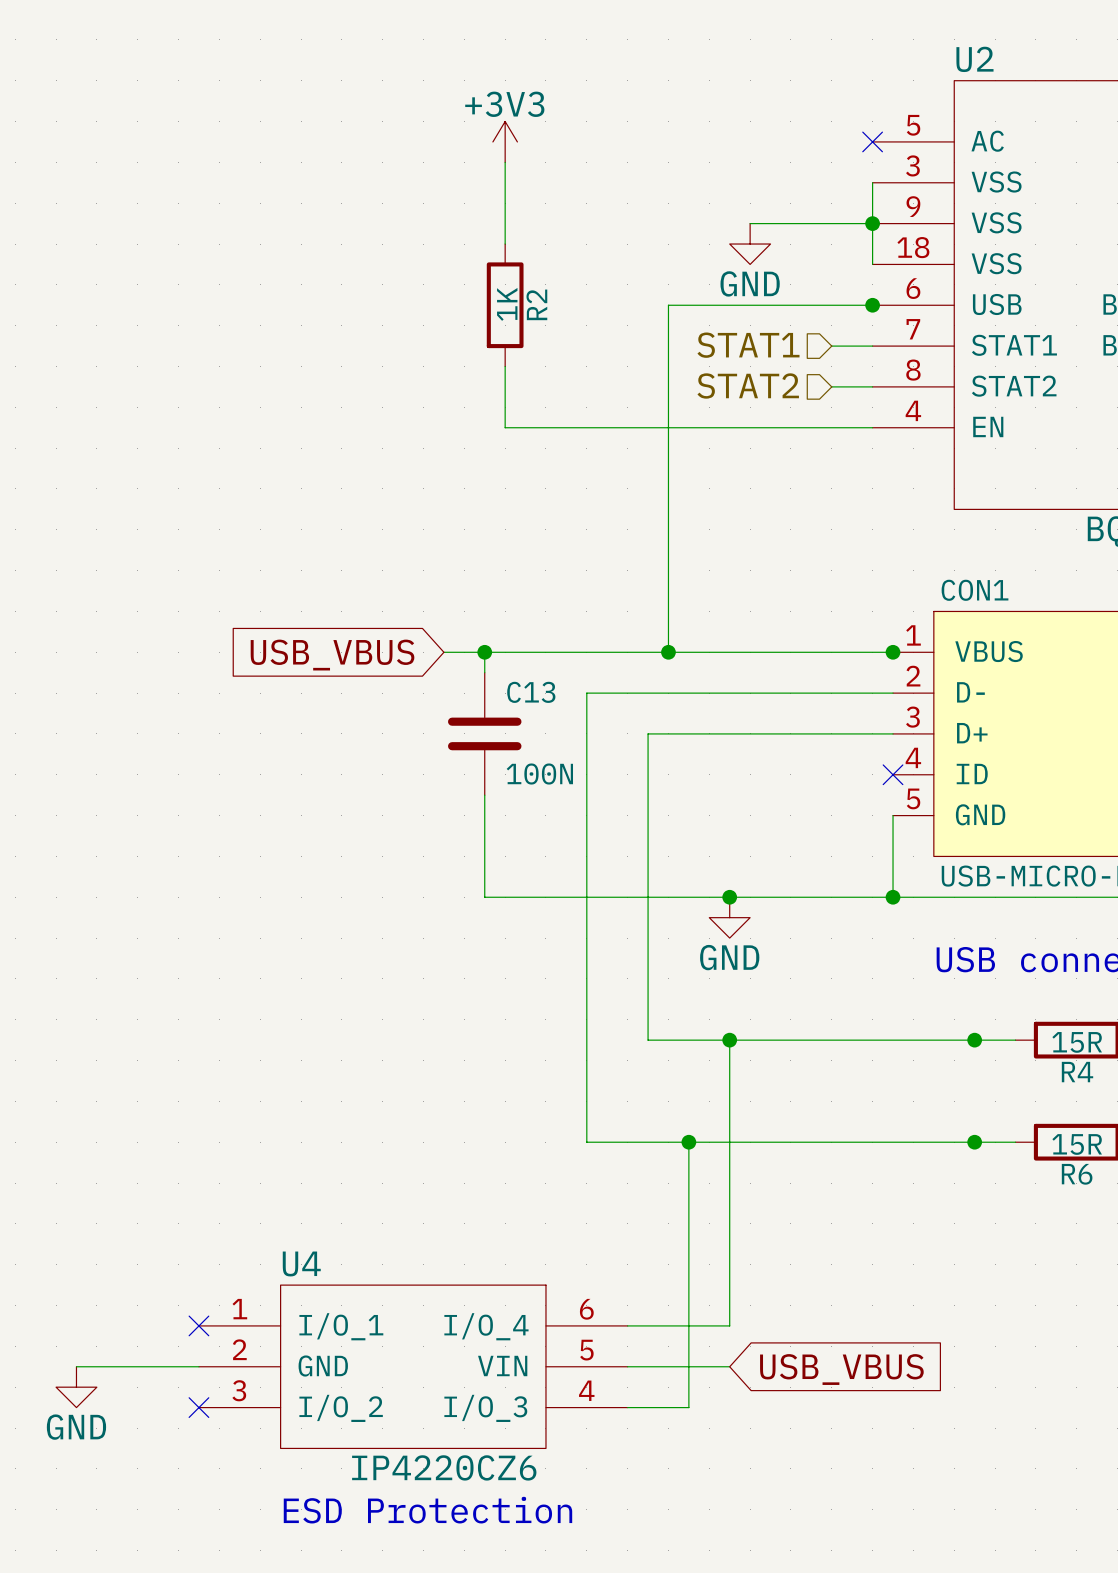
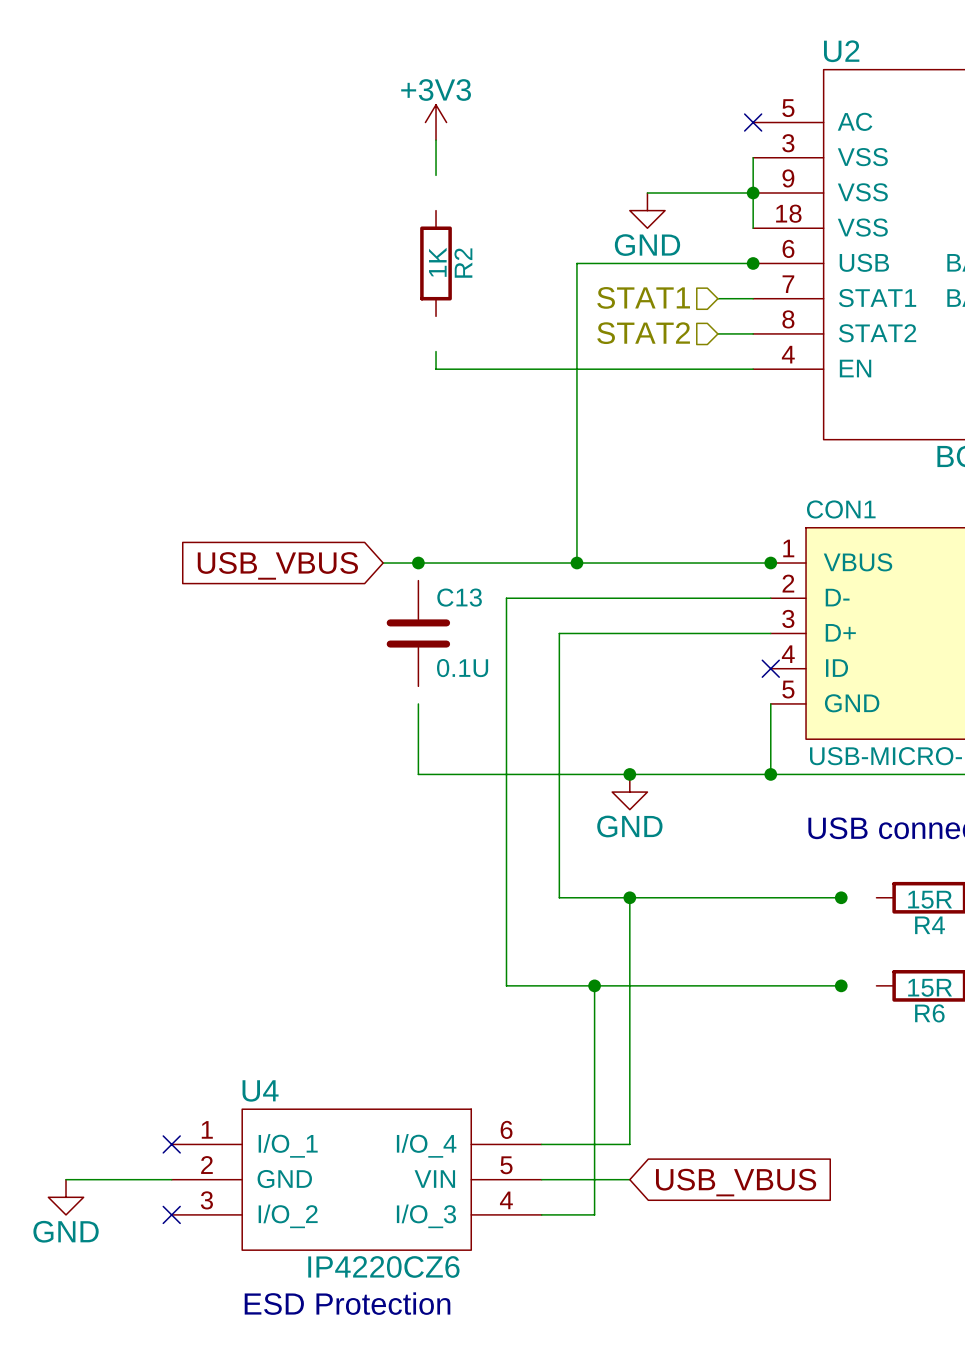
wire: (505, 203) (505, 244) -> none
wire: (505, 366) (505, 407) -> none
wire: (484, 652) (484, 672) -> none
C13 value: 100N (539, 774) -> 0.1U (462, 668)
wire: (484, 795) (484, 815) -> none
wire: (974, 1040) (1015, 1040) -> none
wire: (974, 1142) (1015, 1142) -> none

